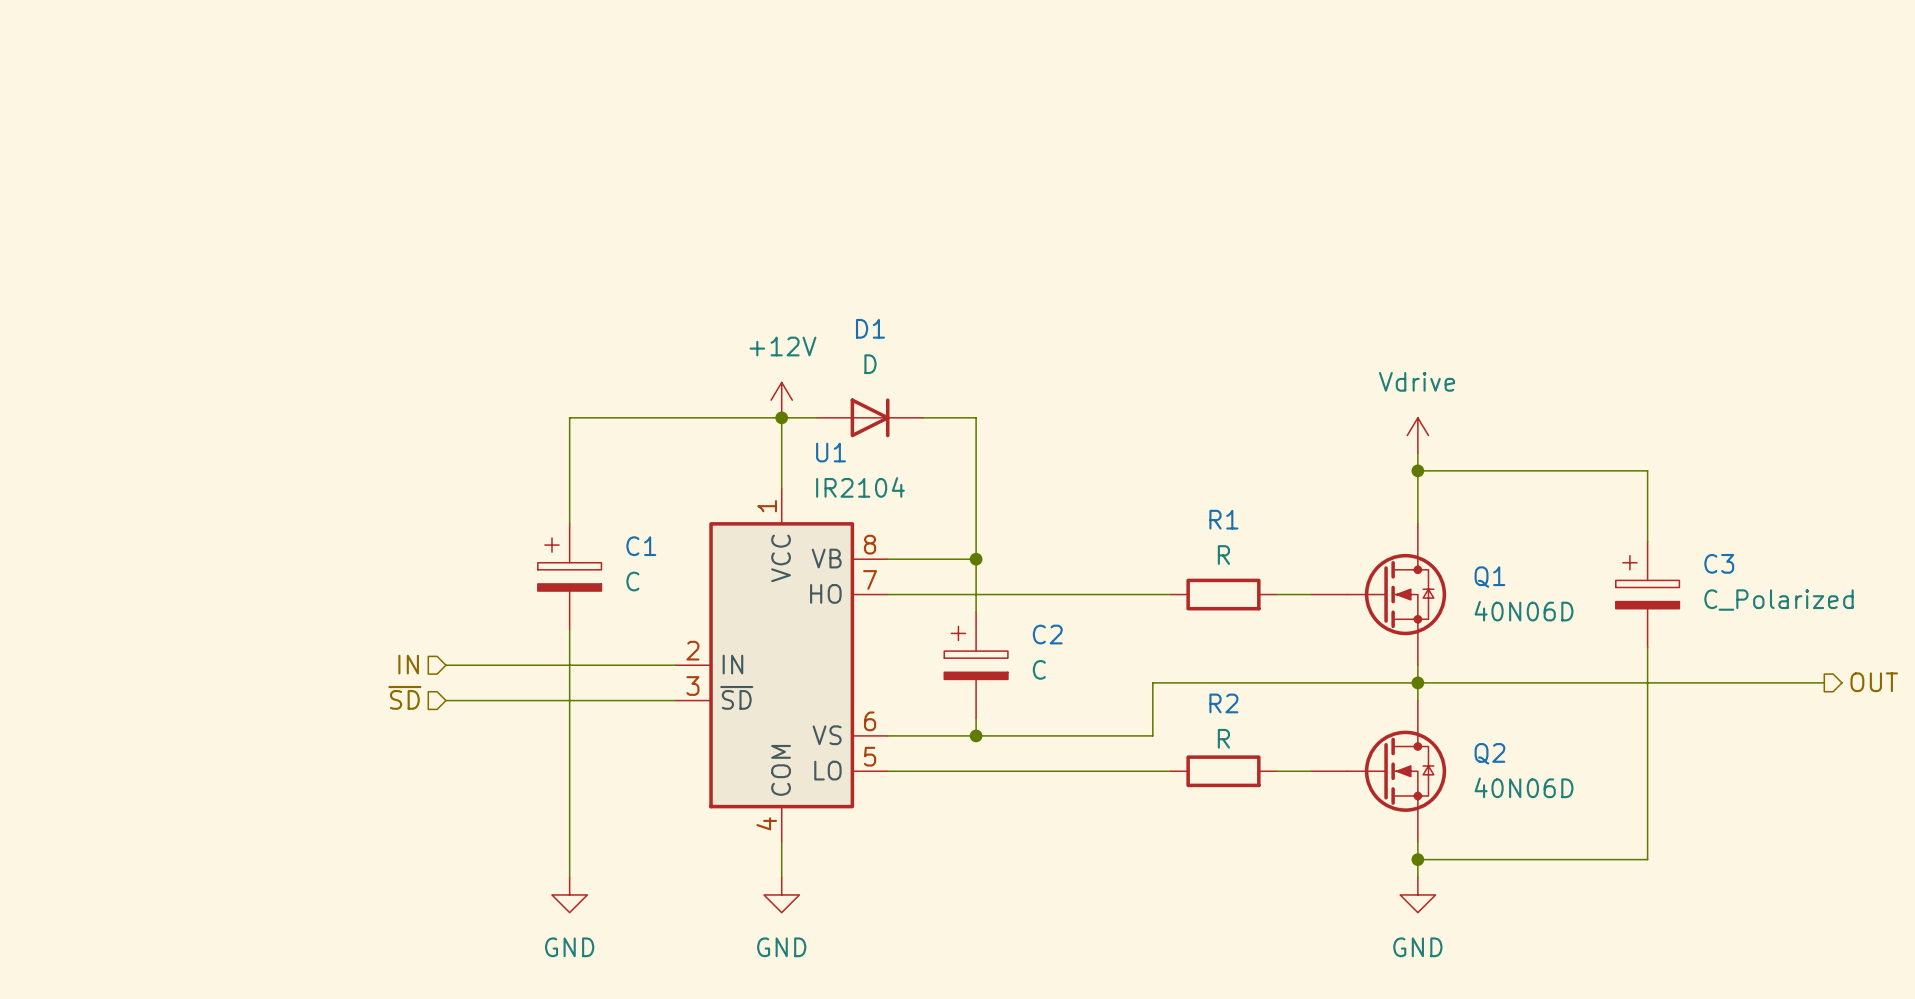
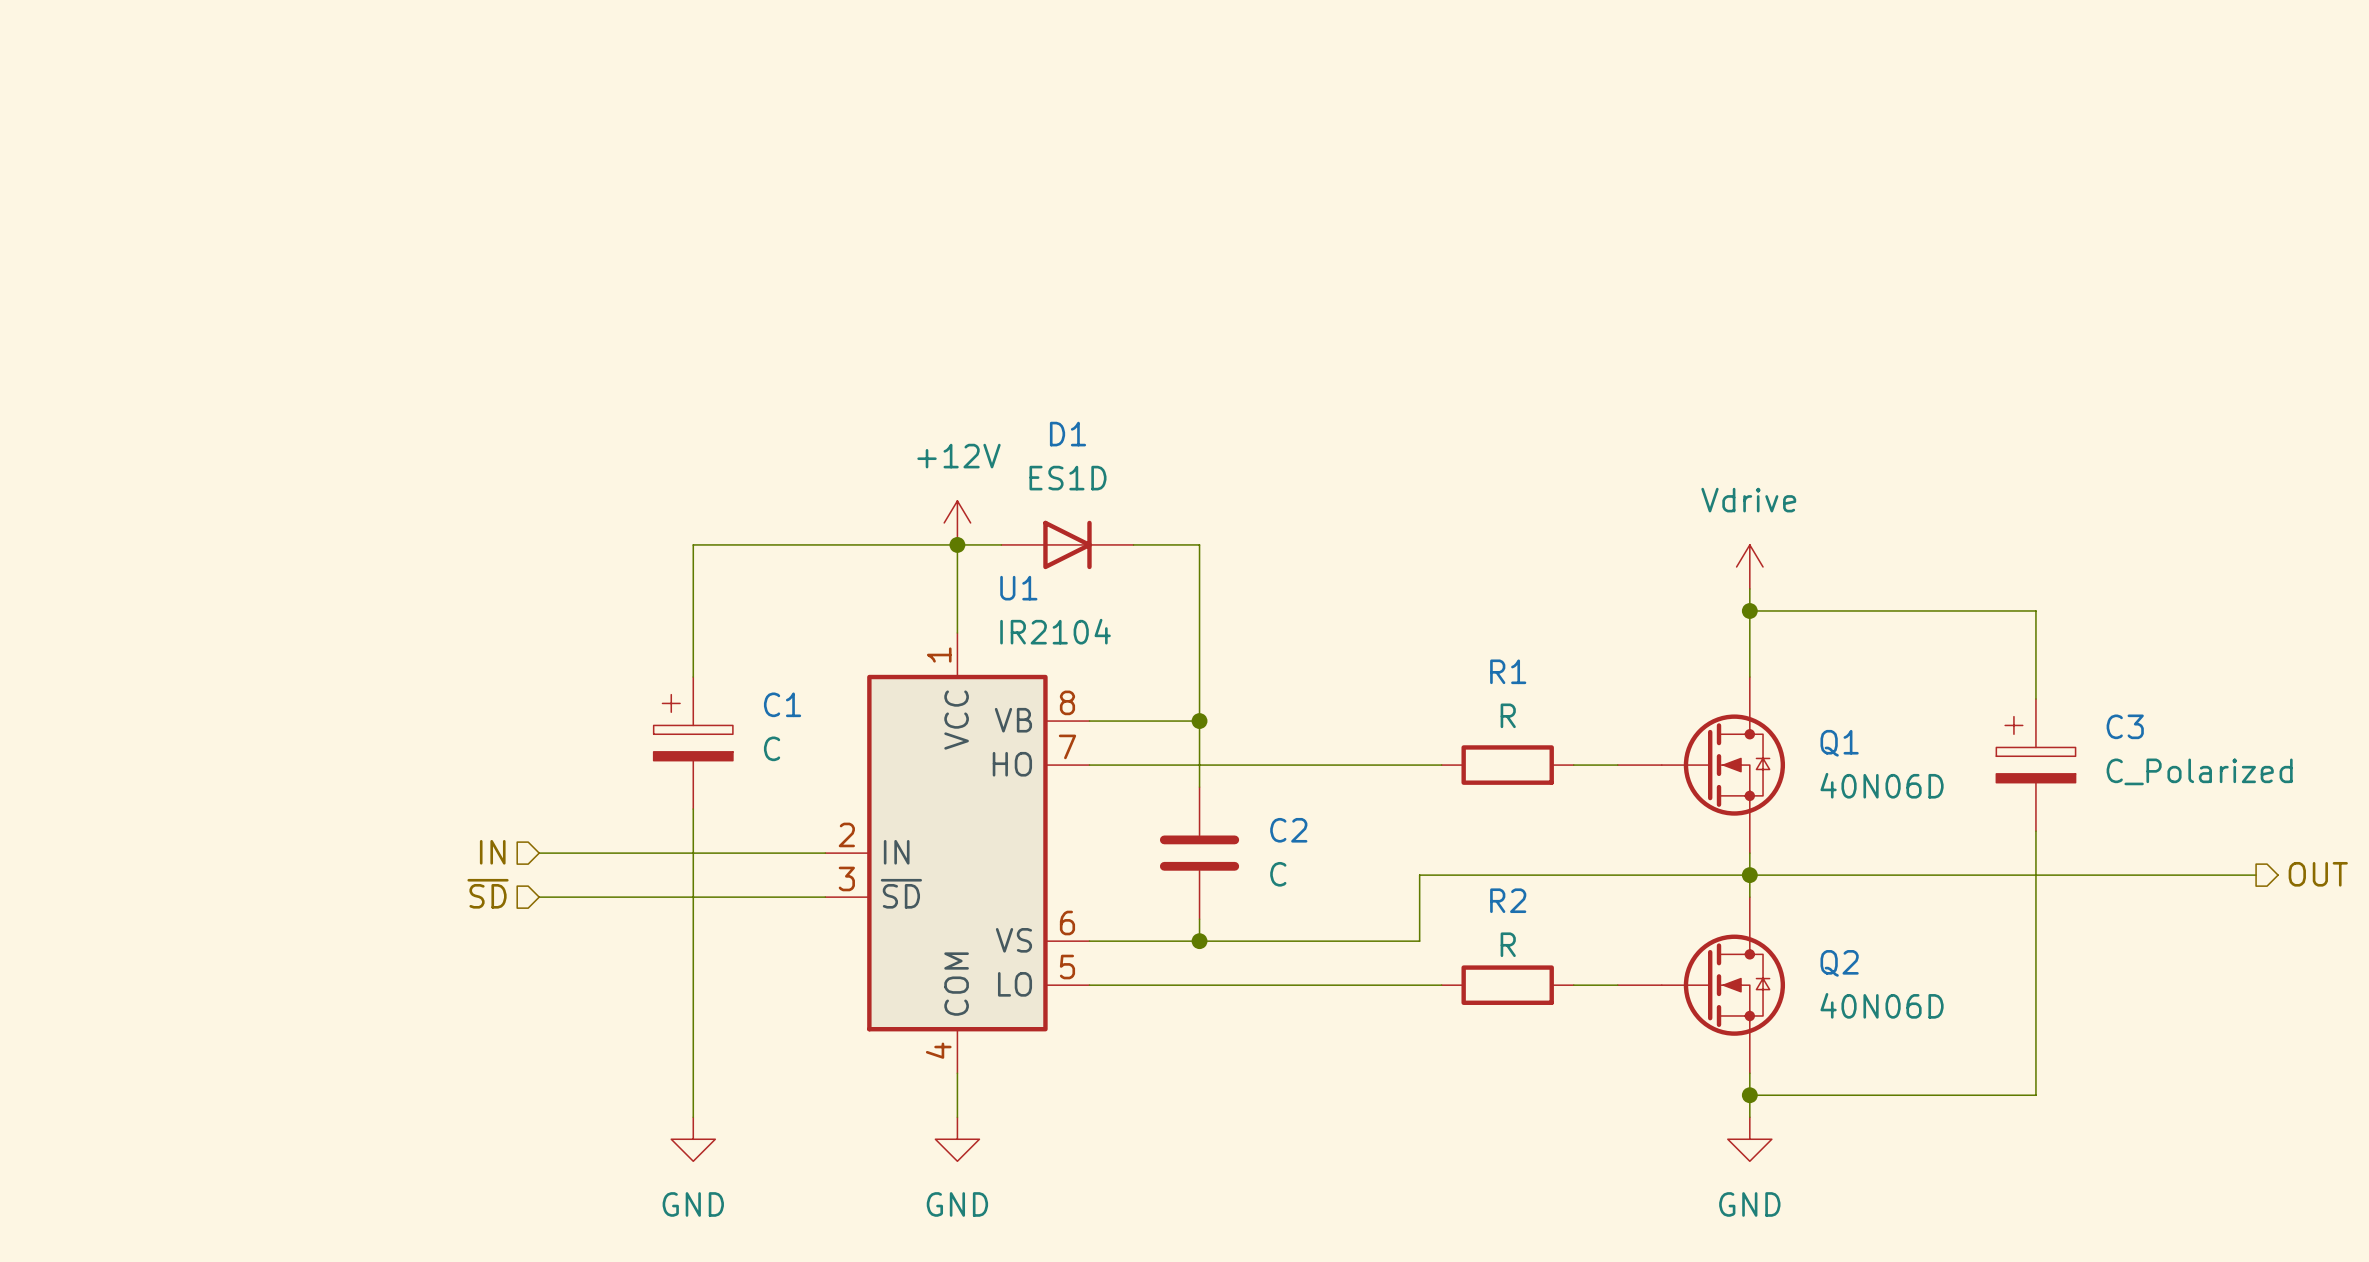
D1 value: D (870, 364) -> ES1D (1067, 478)
C2 symbol: [944, 612, 1008, 719] -> [1159, 787, 1240, 920]

